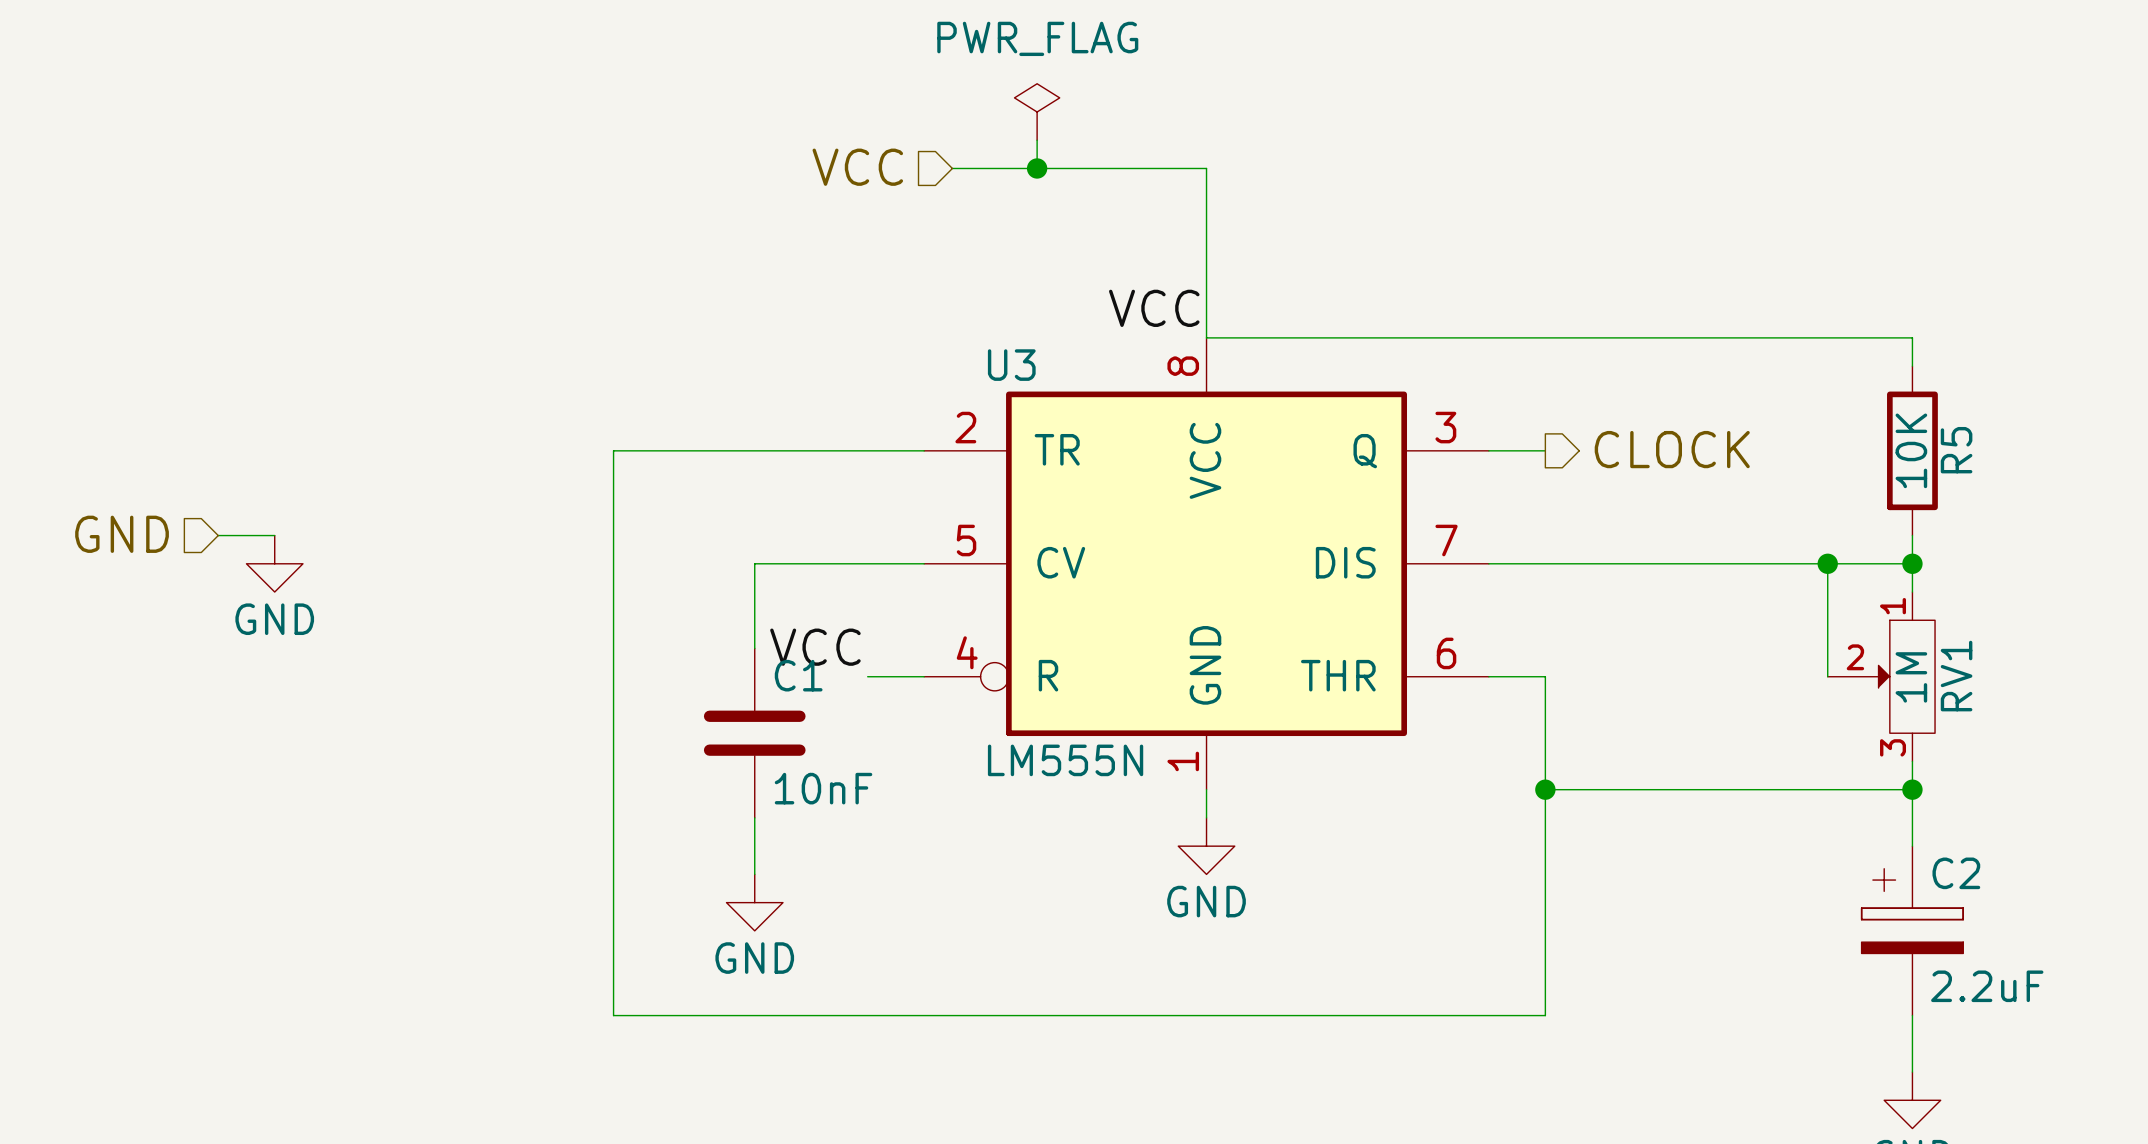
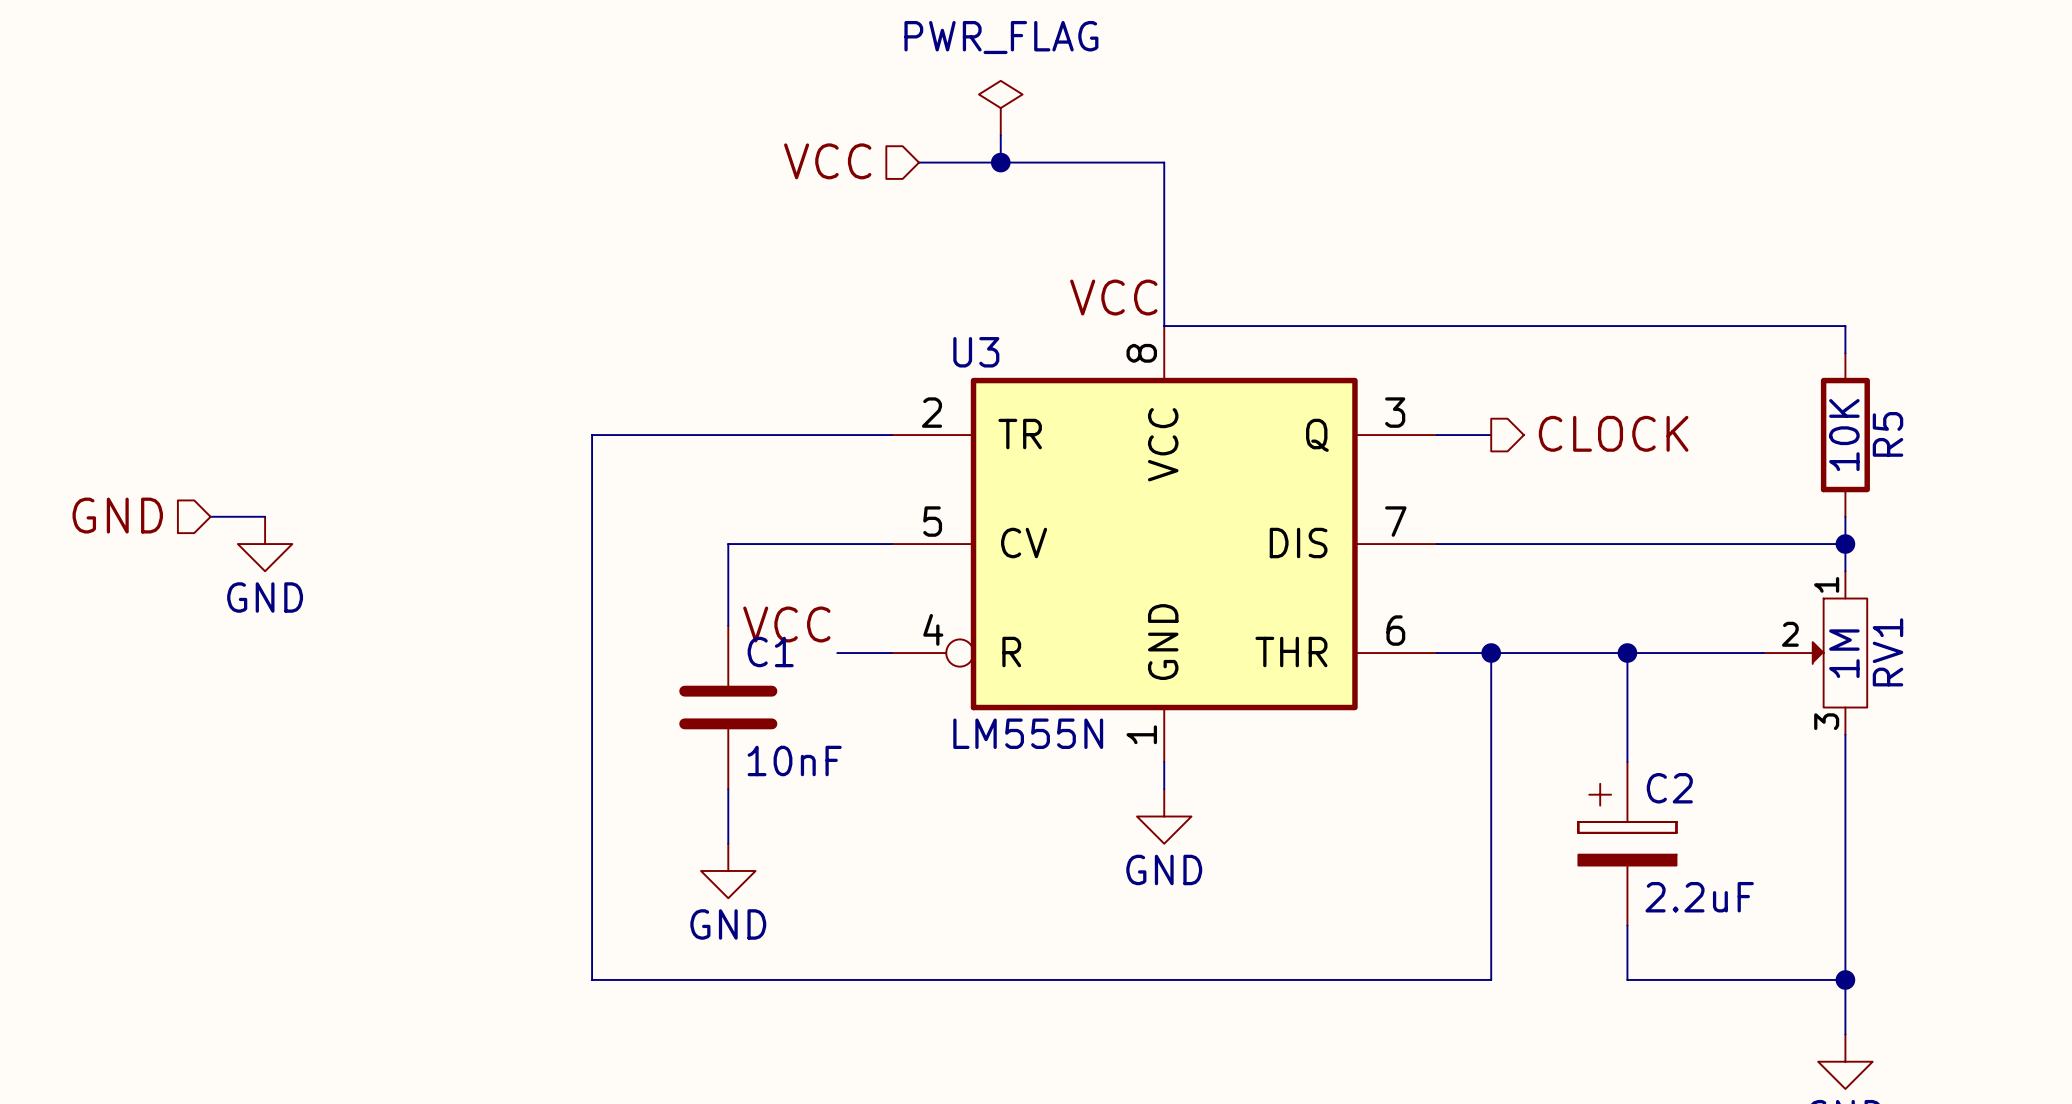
wire: (1827, 563) (1827, 676) -> (1491, 653) (1763, 653)
junction: (1827, 563) -> none
junction: none -> (1491, 653)
wire: none -> (1627, 653) (1627, 762)
junction: none -> (1627, 653)
wire: (1545, 789) (1912, 789) -> none
junction: (1545, 789) -> none
junction: (1912, 789) -> none
wire: none -> (1845, 816) (1845, 979) (1627, 979) (1627, 925)
C2 position: (1912, 930) -> (1627, 843)
junction: none -> (1845, 979)

